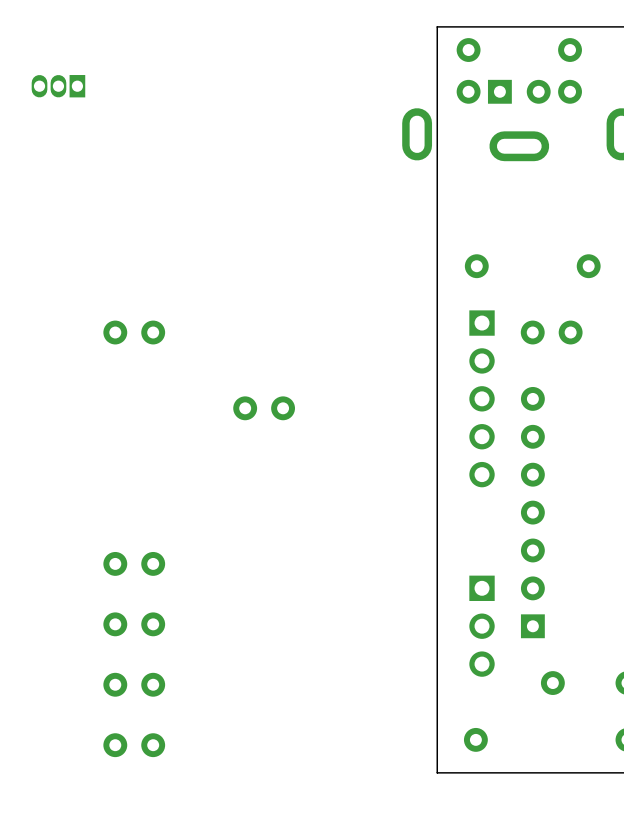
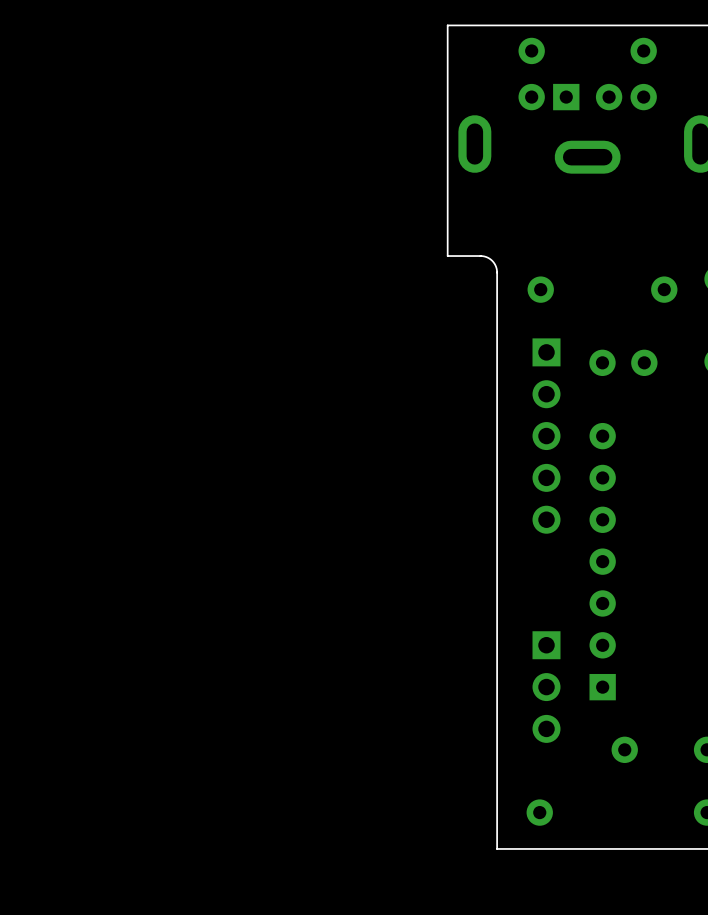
board edge: (437, 26) (437, 250) -> (497, 25) (447, 25) (447, 256) (486, 256) (493, 262) (497, 272)
part: (58, 86) -> none
part: (134, 332) -> none
part: (264, 408) -> none
part: (134, 563) -> none
part: (134, 624) -> none
part: (134, 684) -> none
part: (134, 745) -> none

